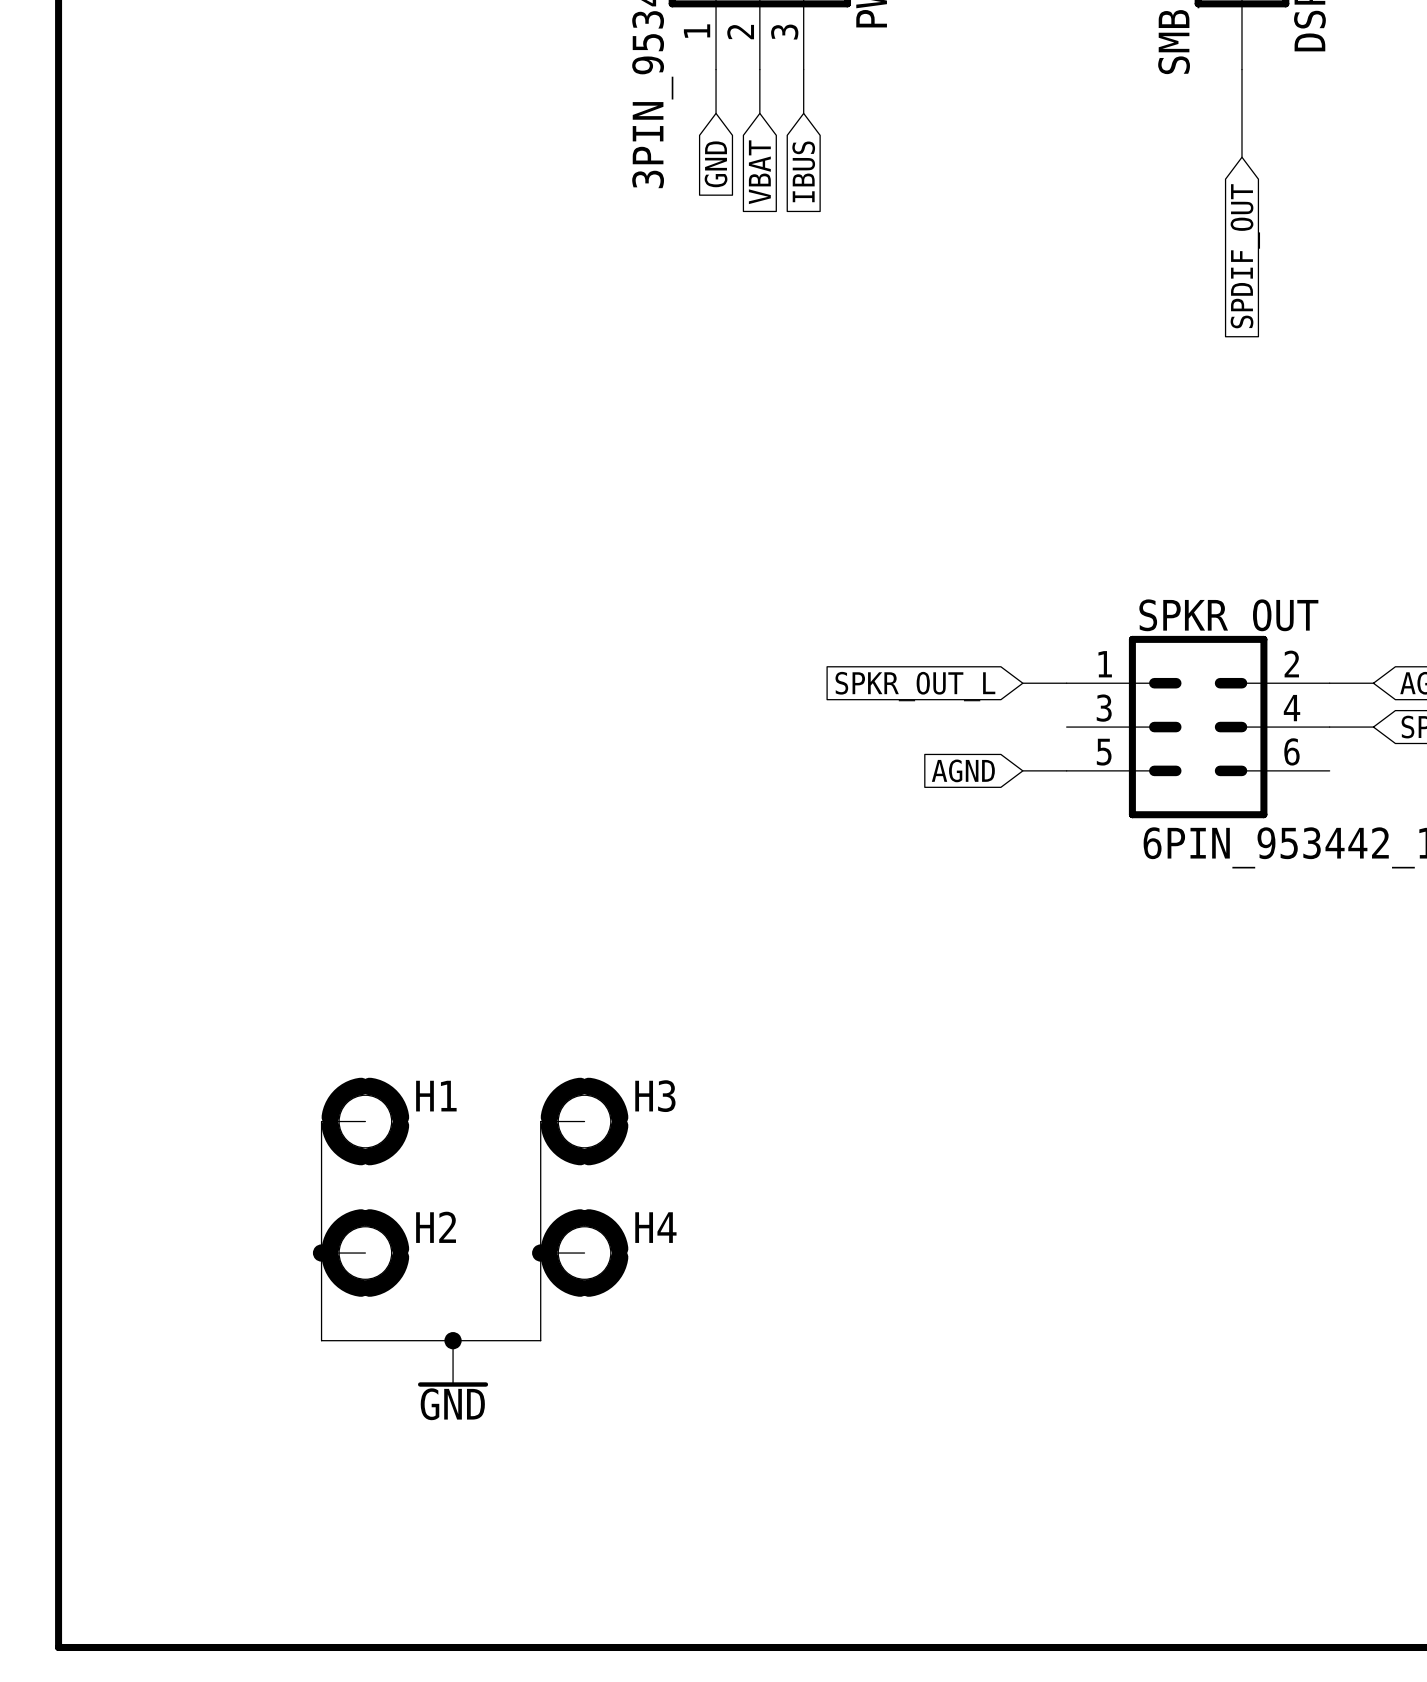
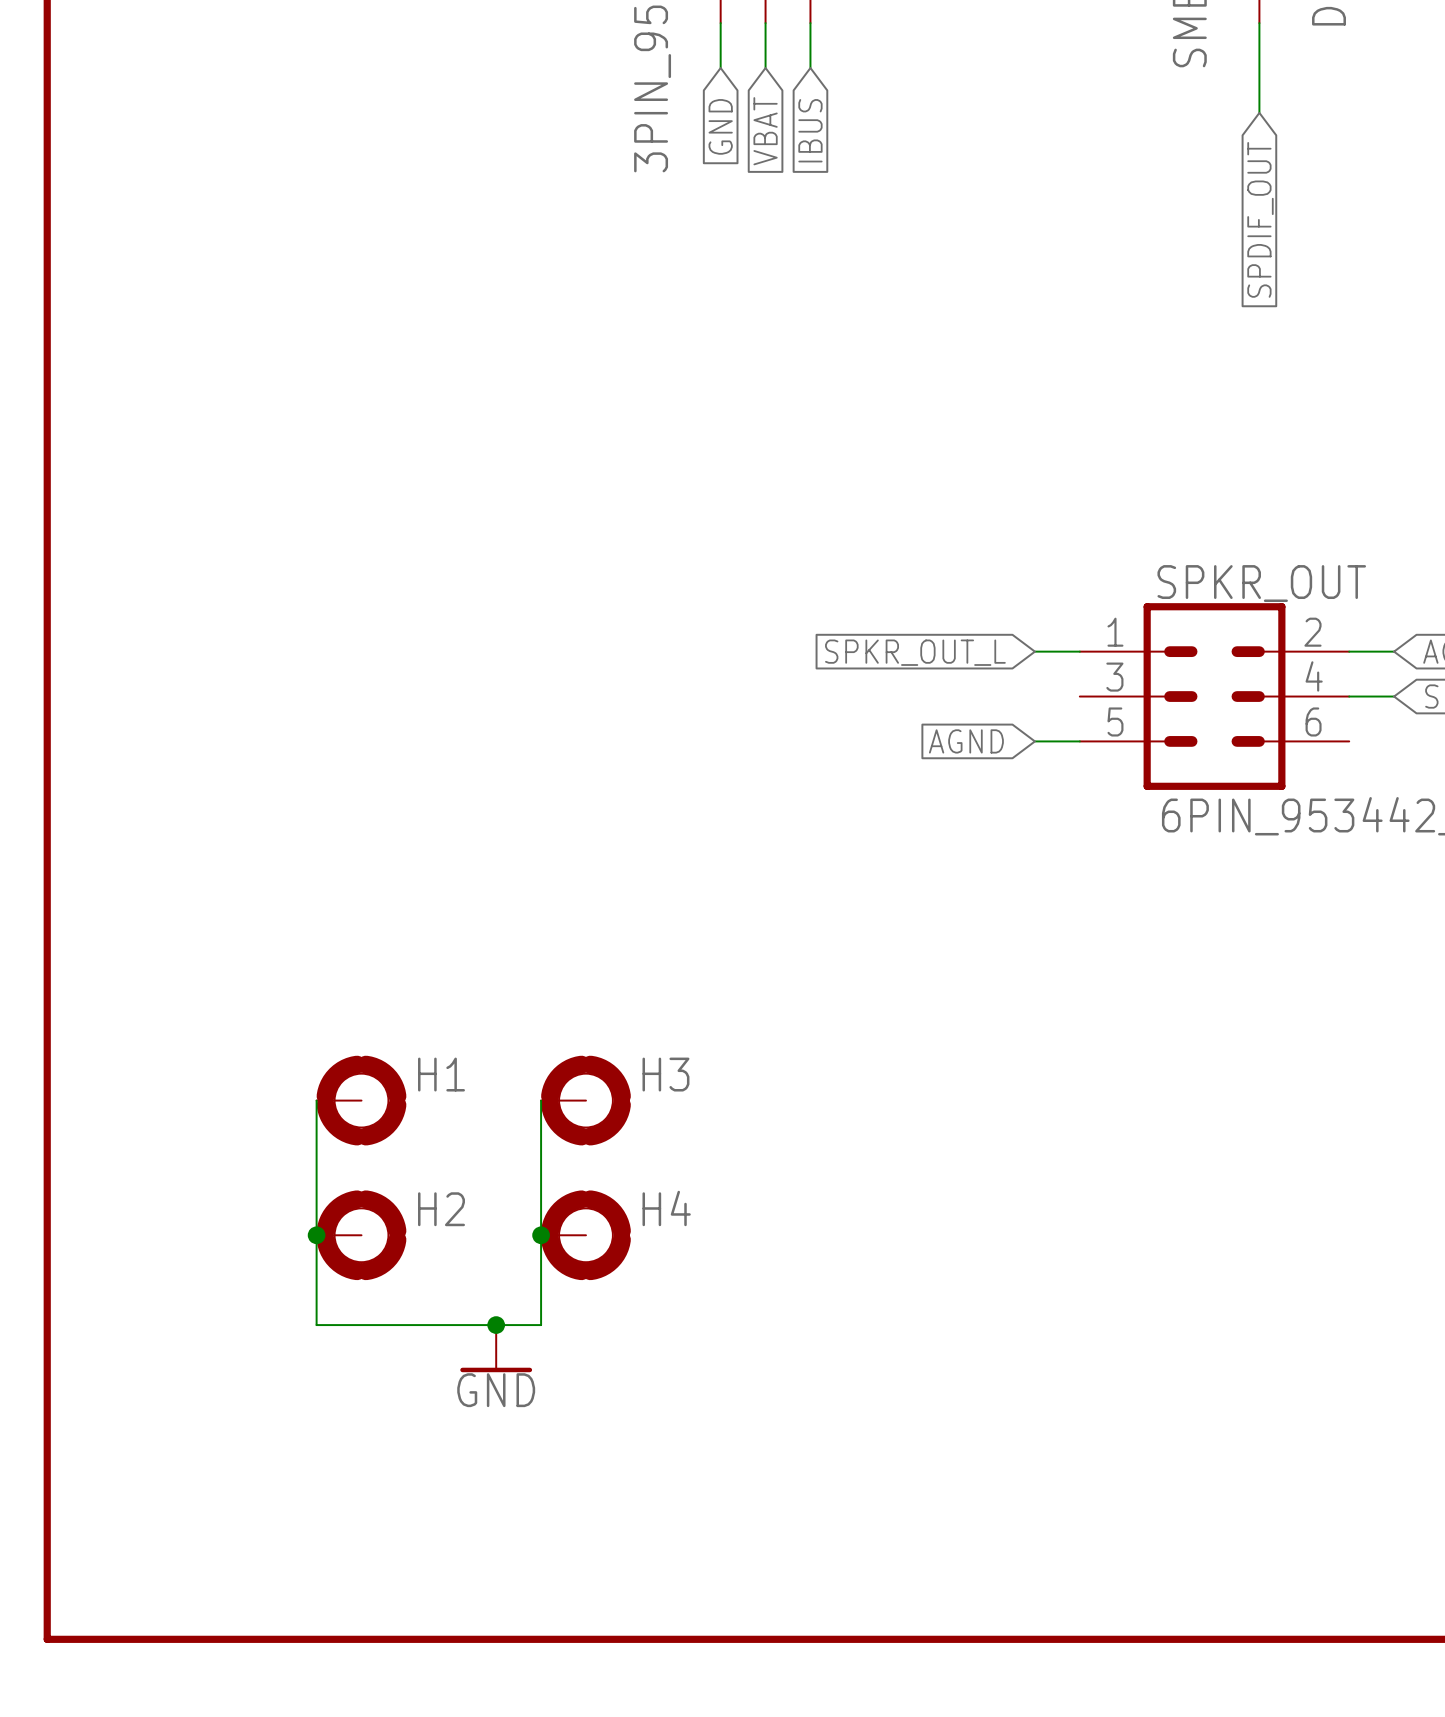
junction position: (453, 1340) -> (496, 1325)
power symbol position: GND (453, 1363) -> GND (496, 1348)

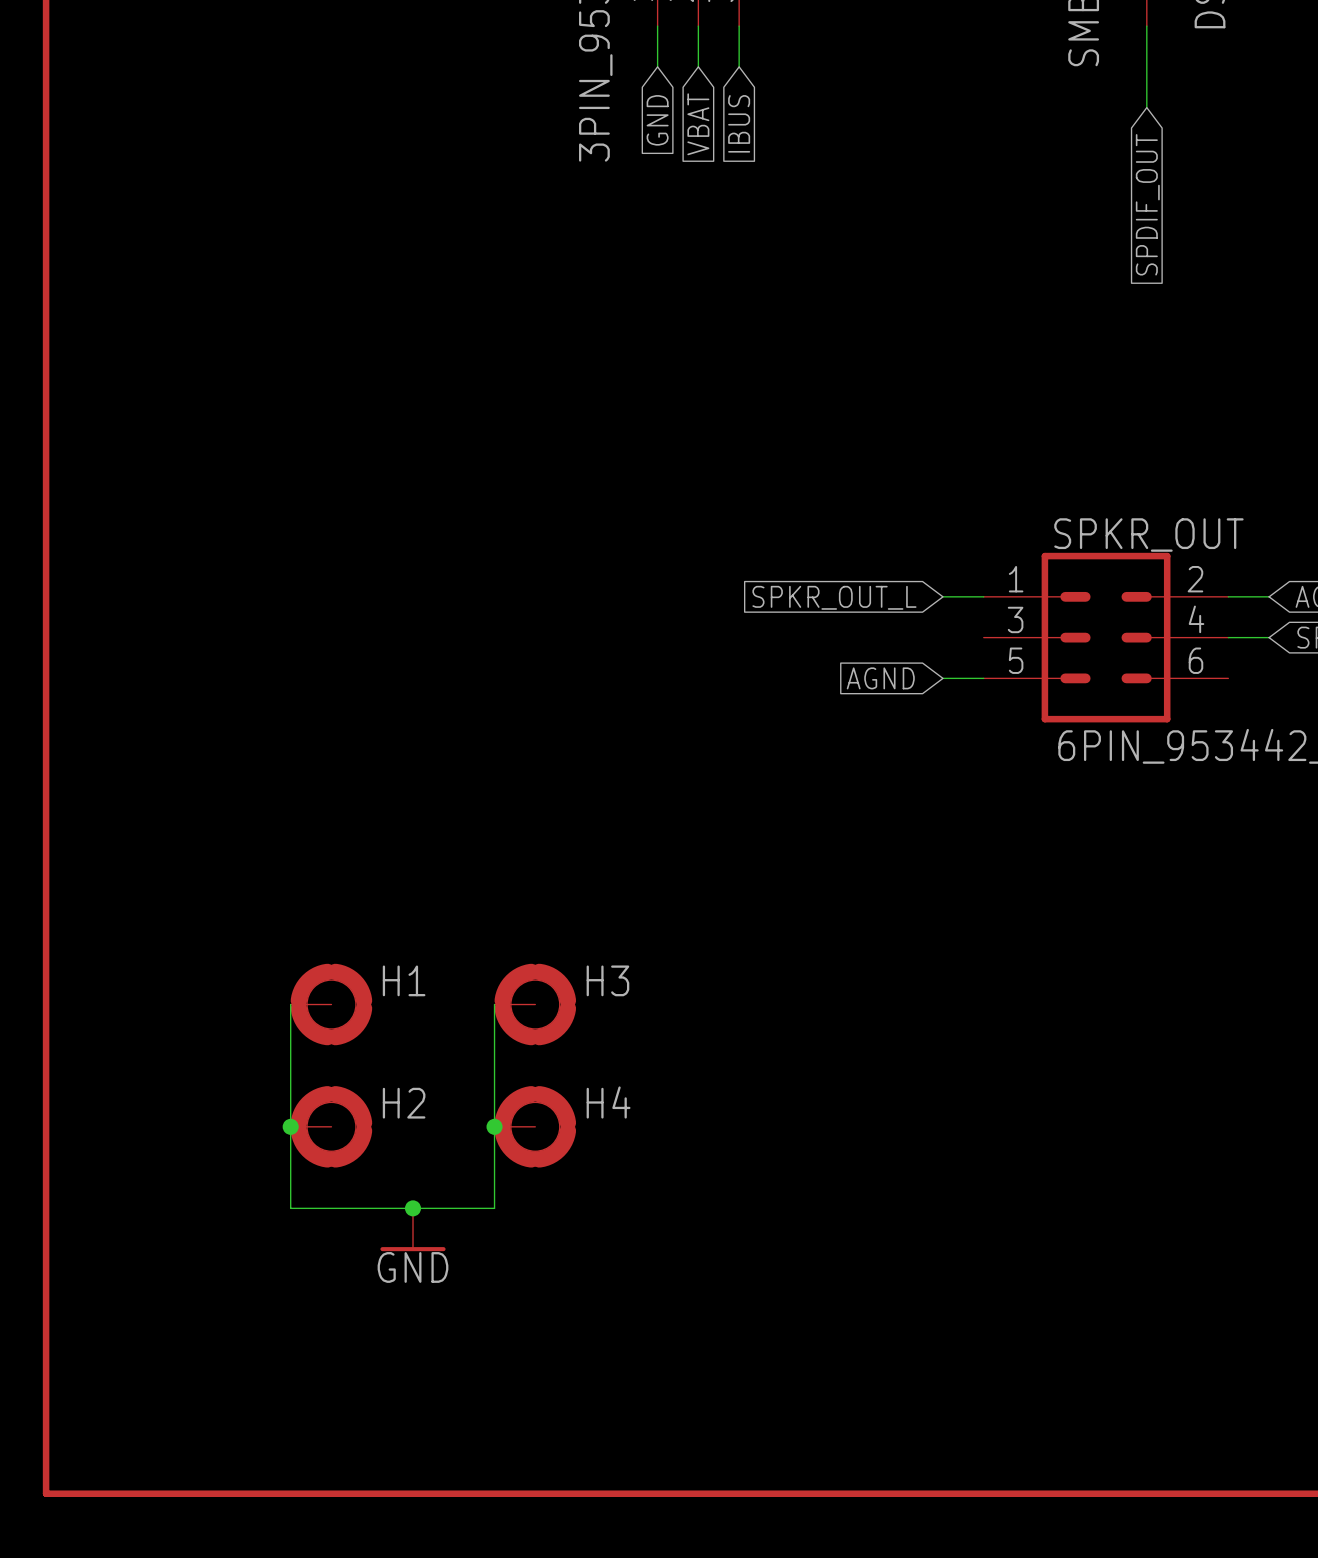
junction position: (496, 1325) -> (413, 1208)
power symbol position: GND (496, 1348) -> GND (413, 1229)

